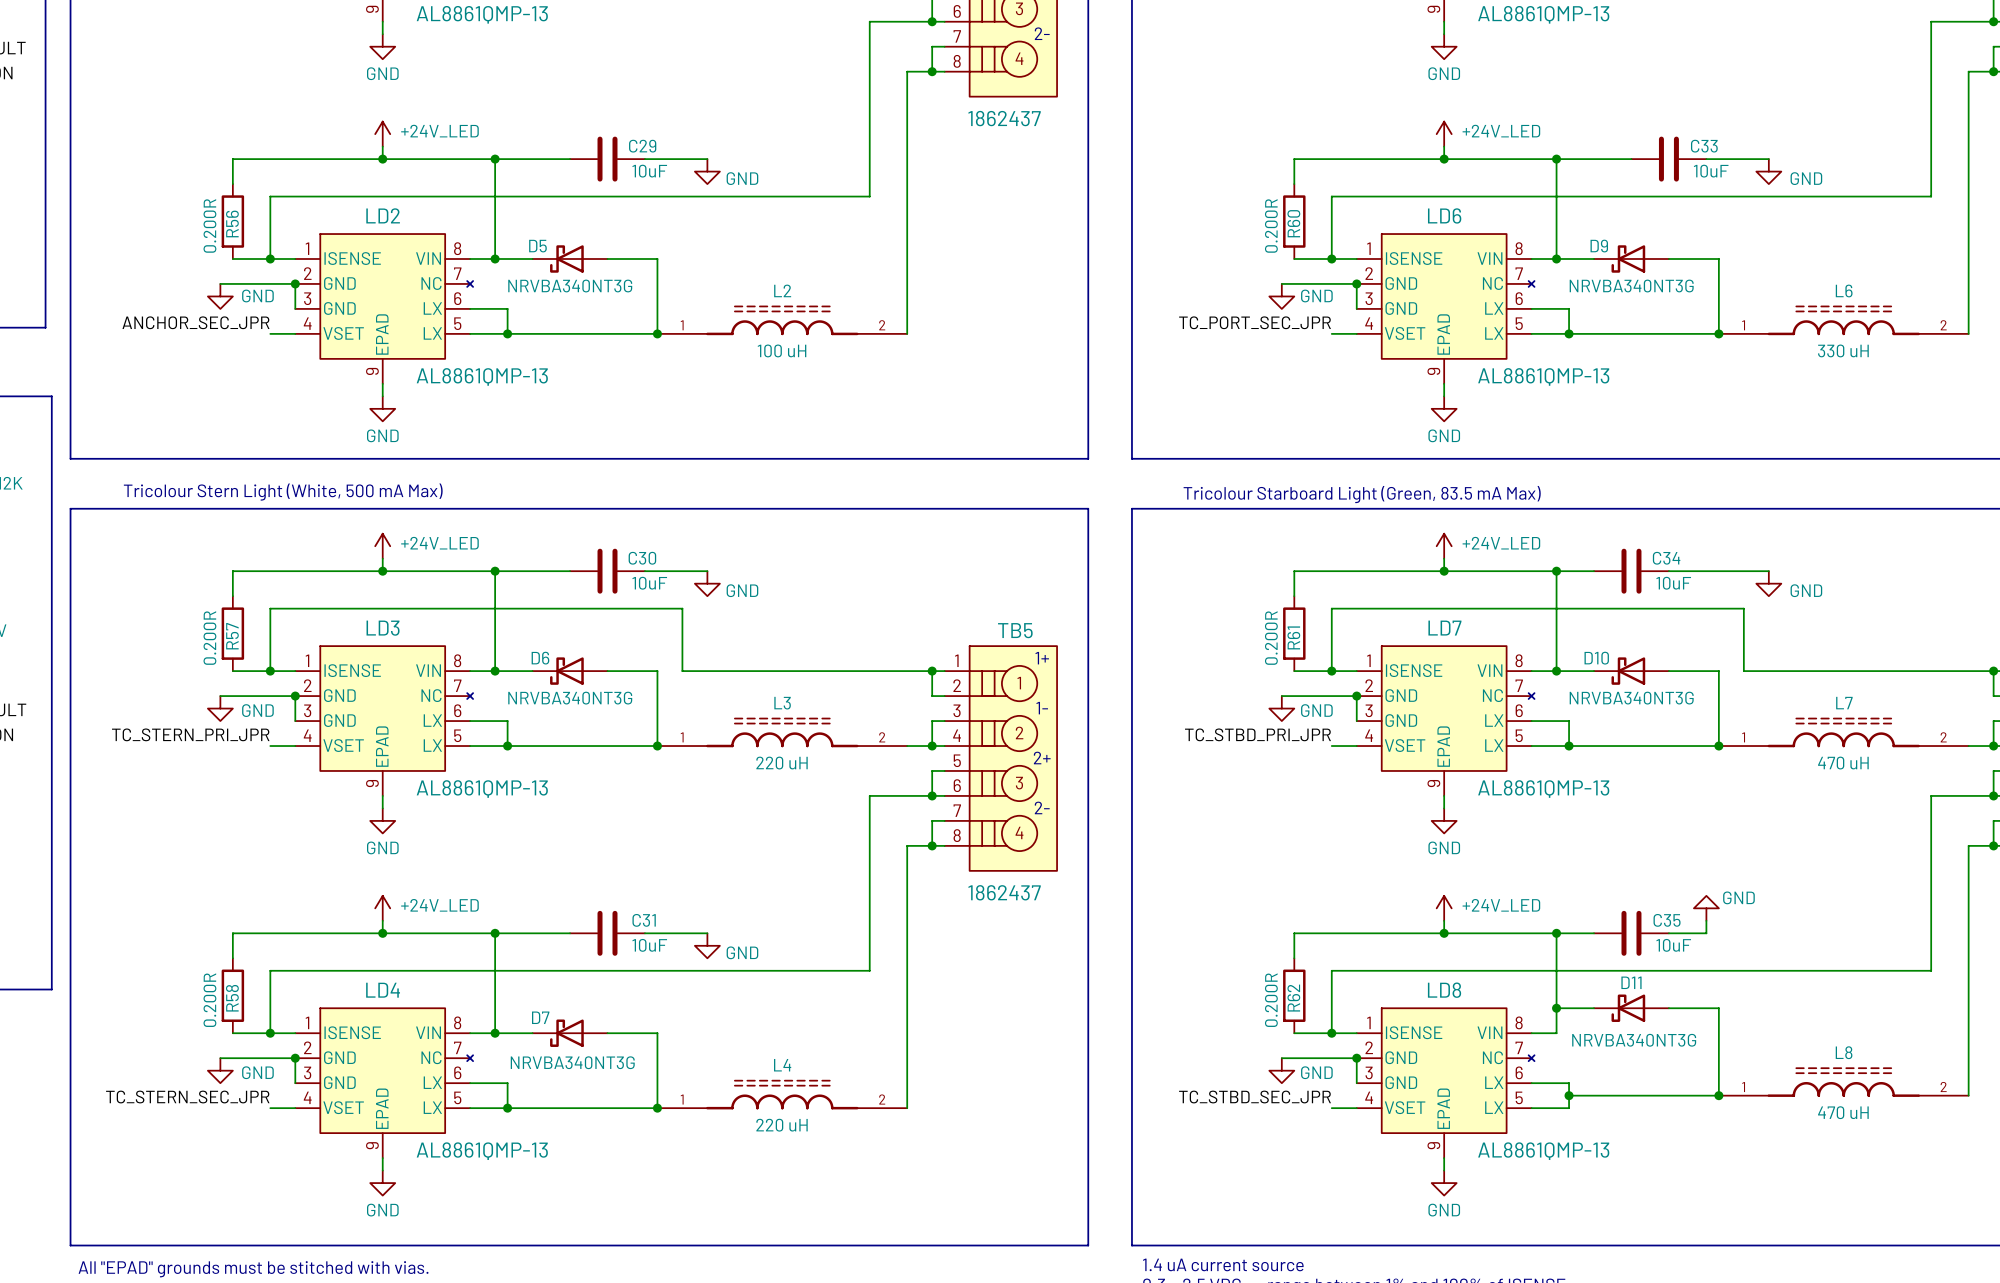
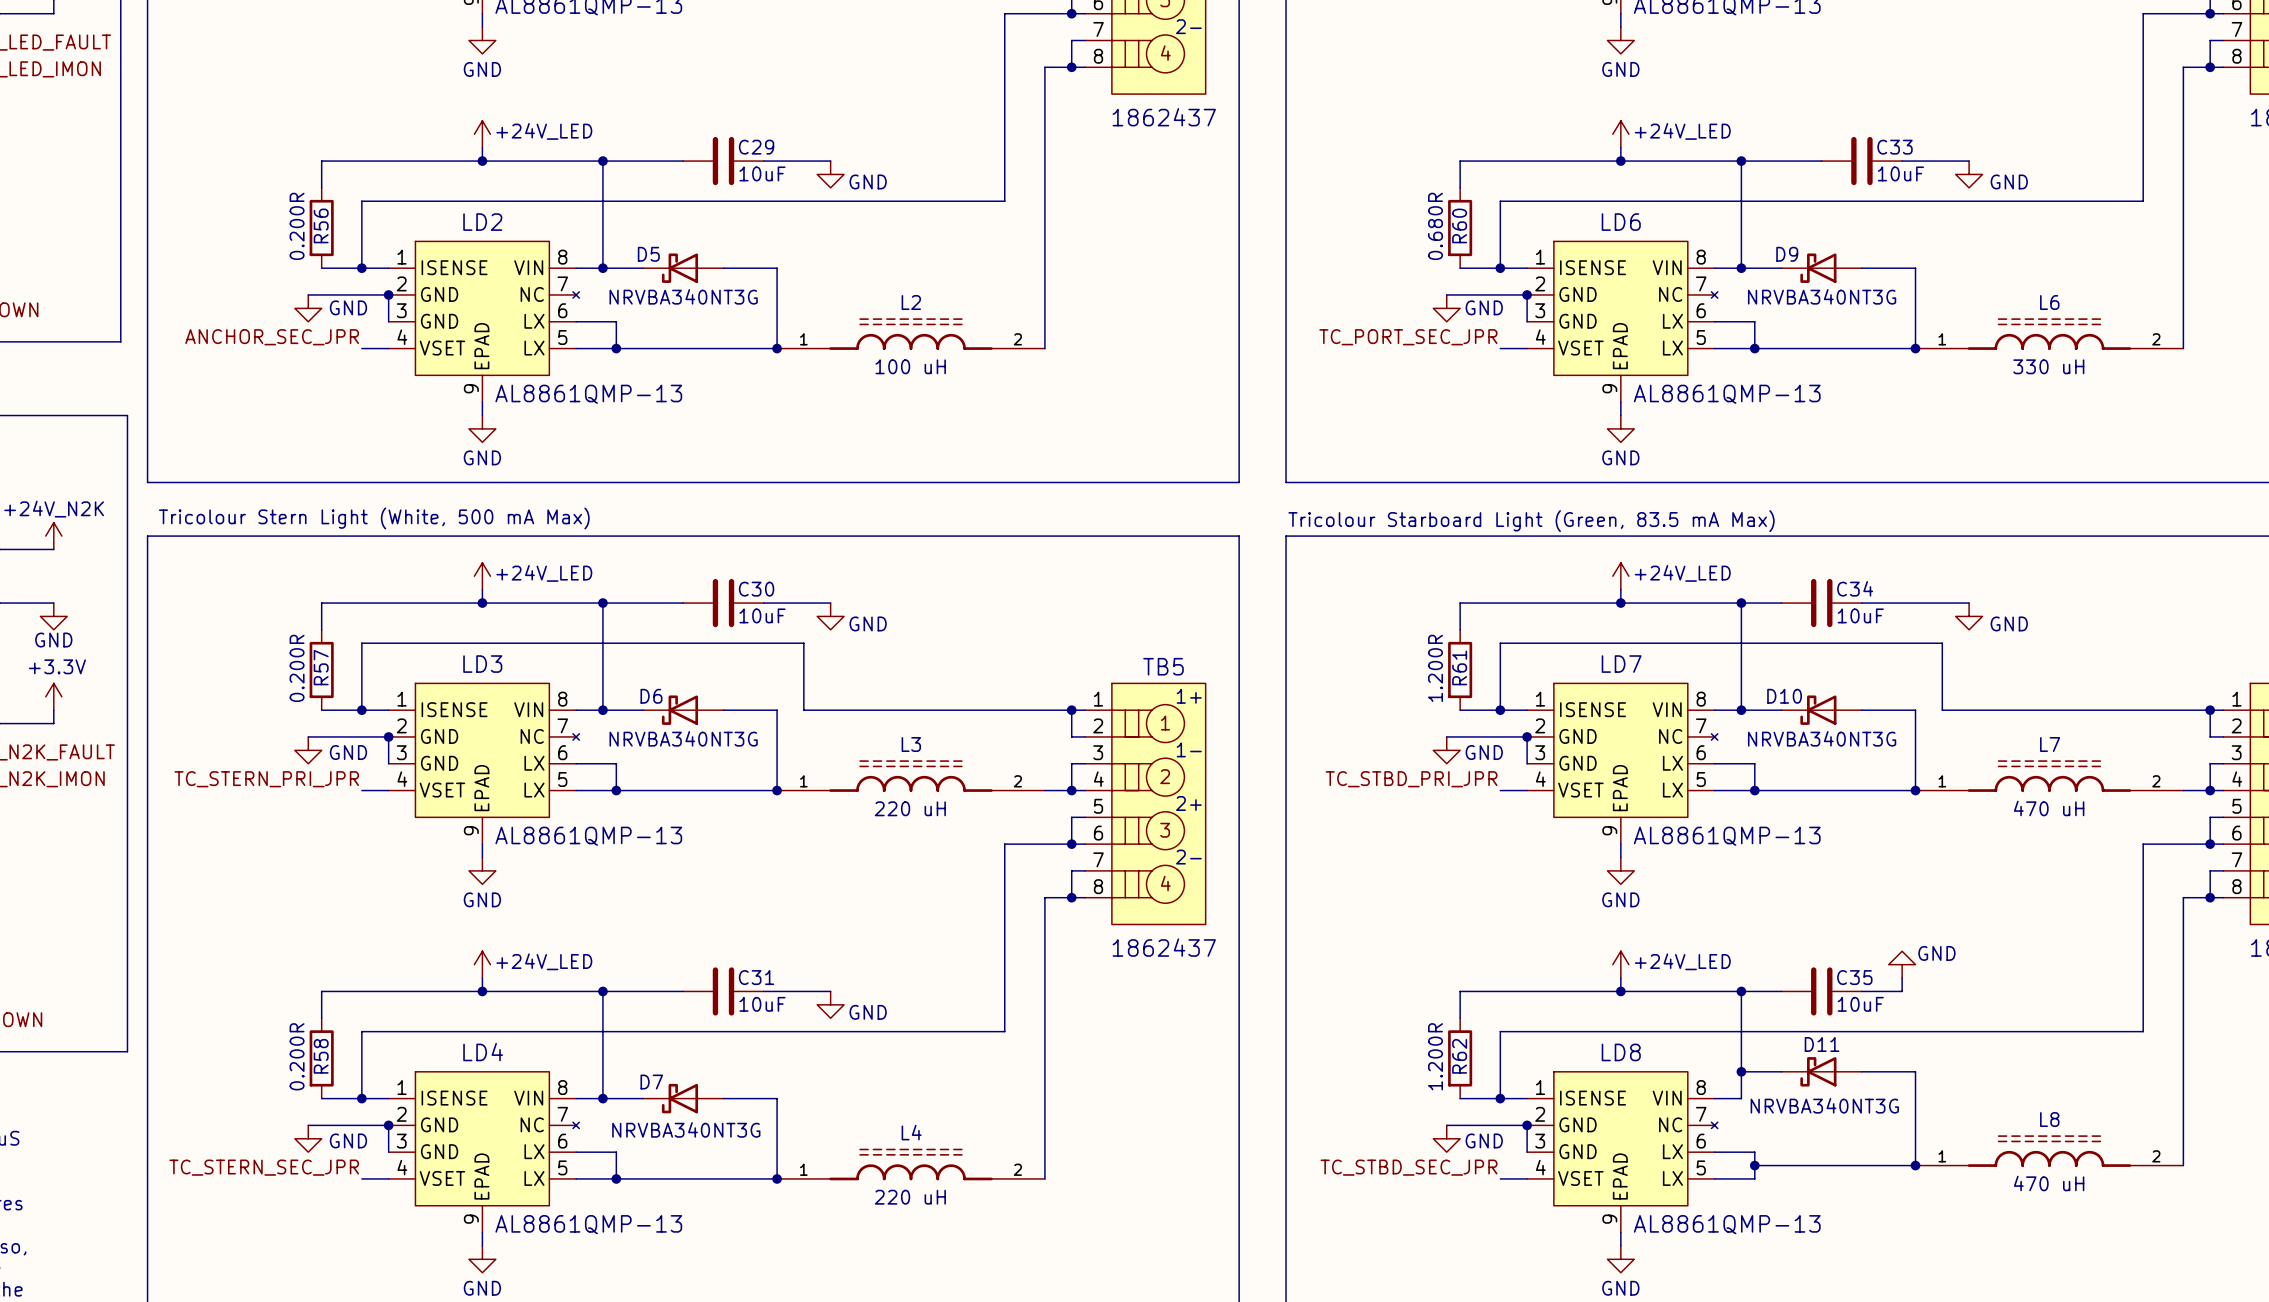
R60 value: 0.200R (1271, 225) -> 0.680R (1435, 226)
R61 value: 0.200R (1271, 638) -> 1.200R (1435, 668)
R62 value: 0.200R (1271, 1000) -> 1.200R (1435, 1056)

